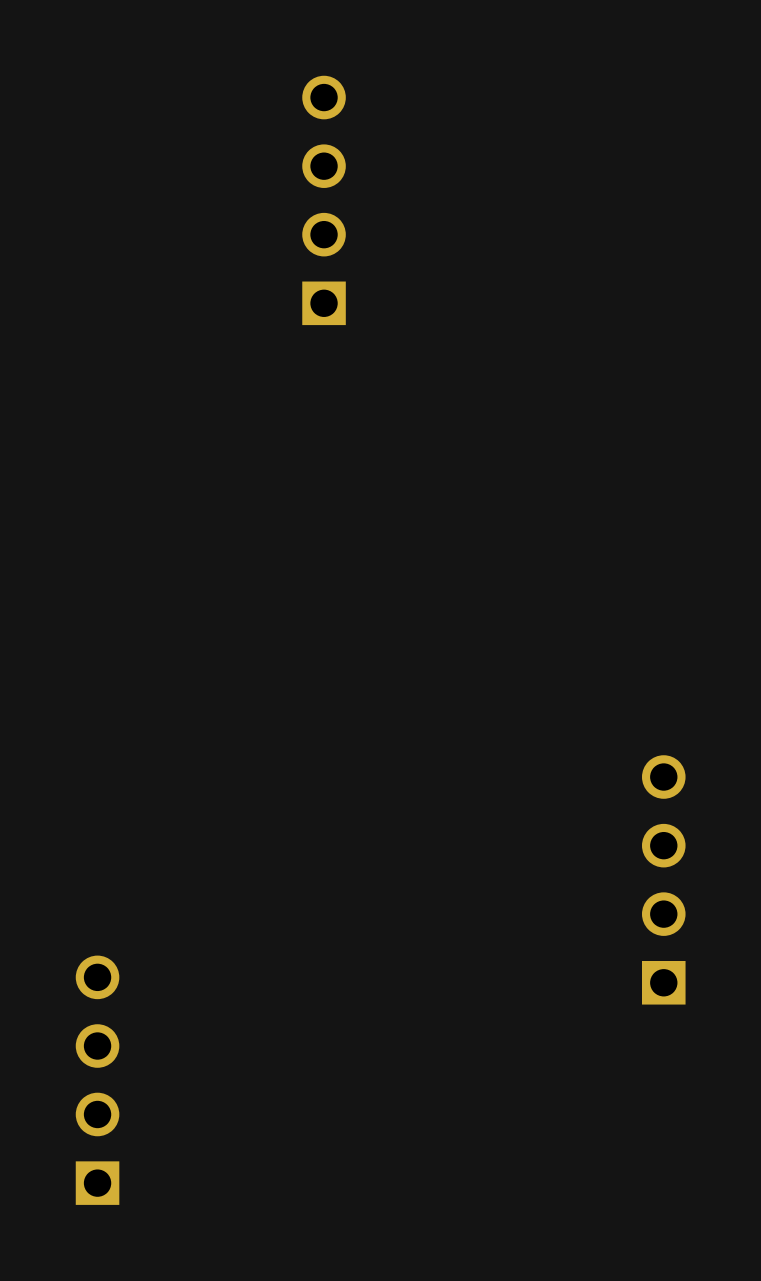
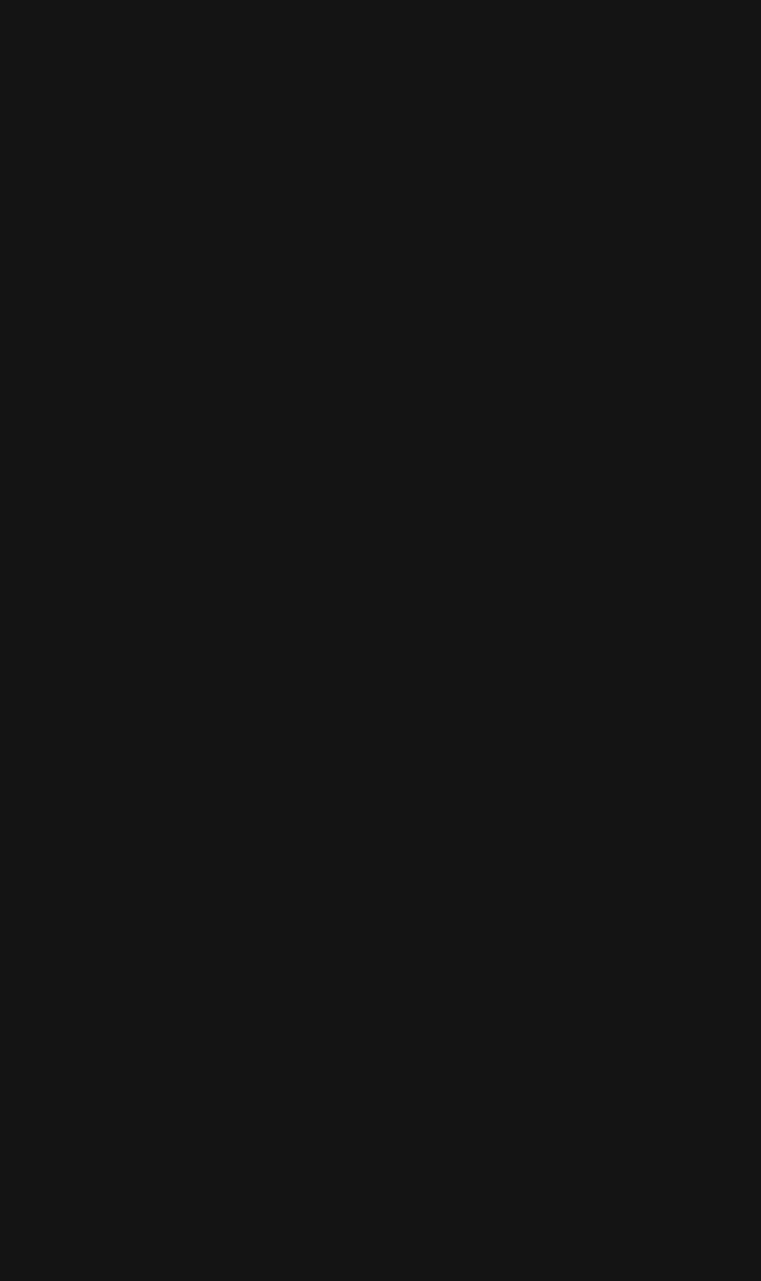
part: (324, 200) -> none
part: (663, 879) -> none
part: (97, 1080) -> none

